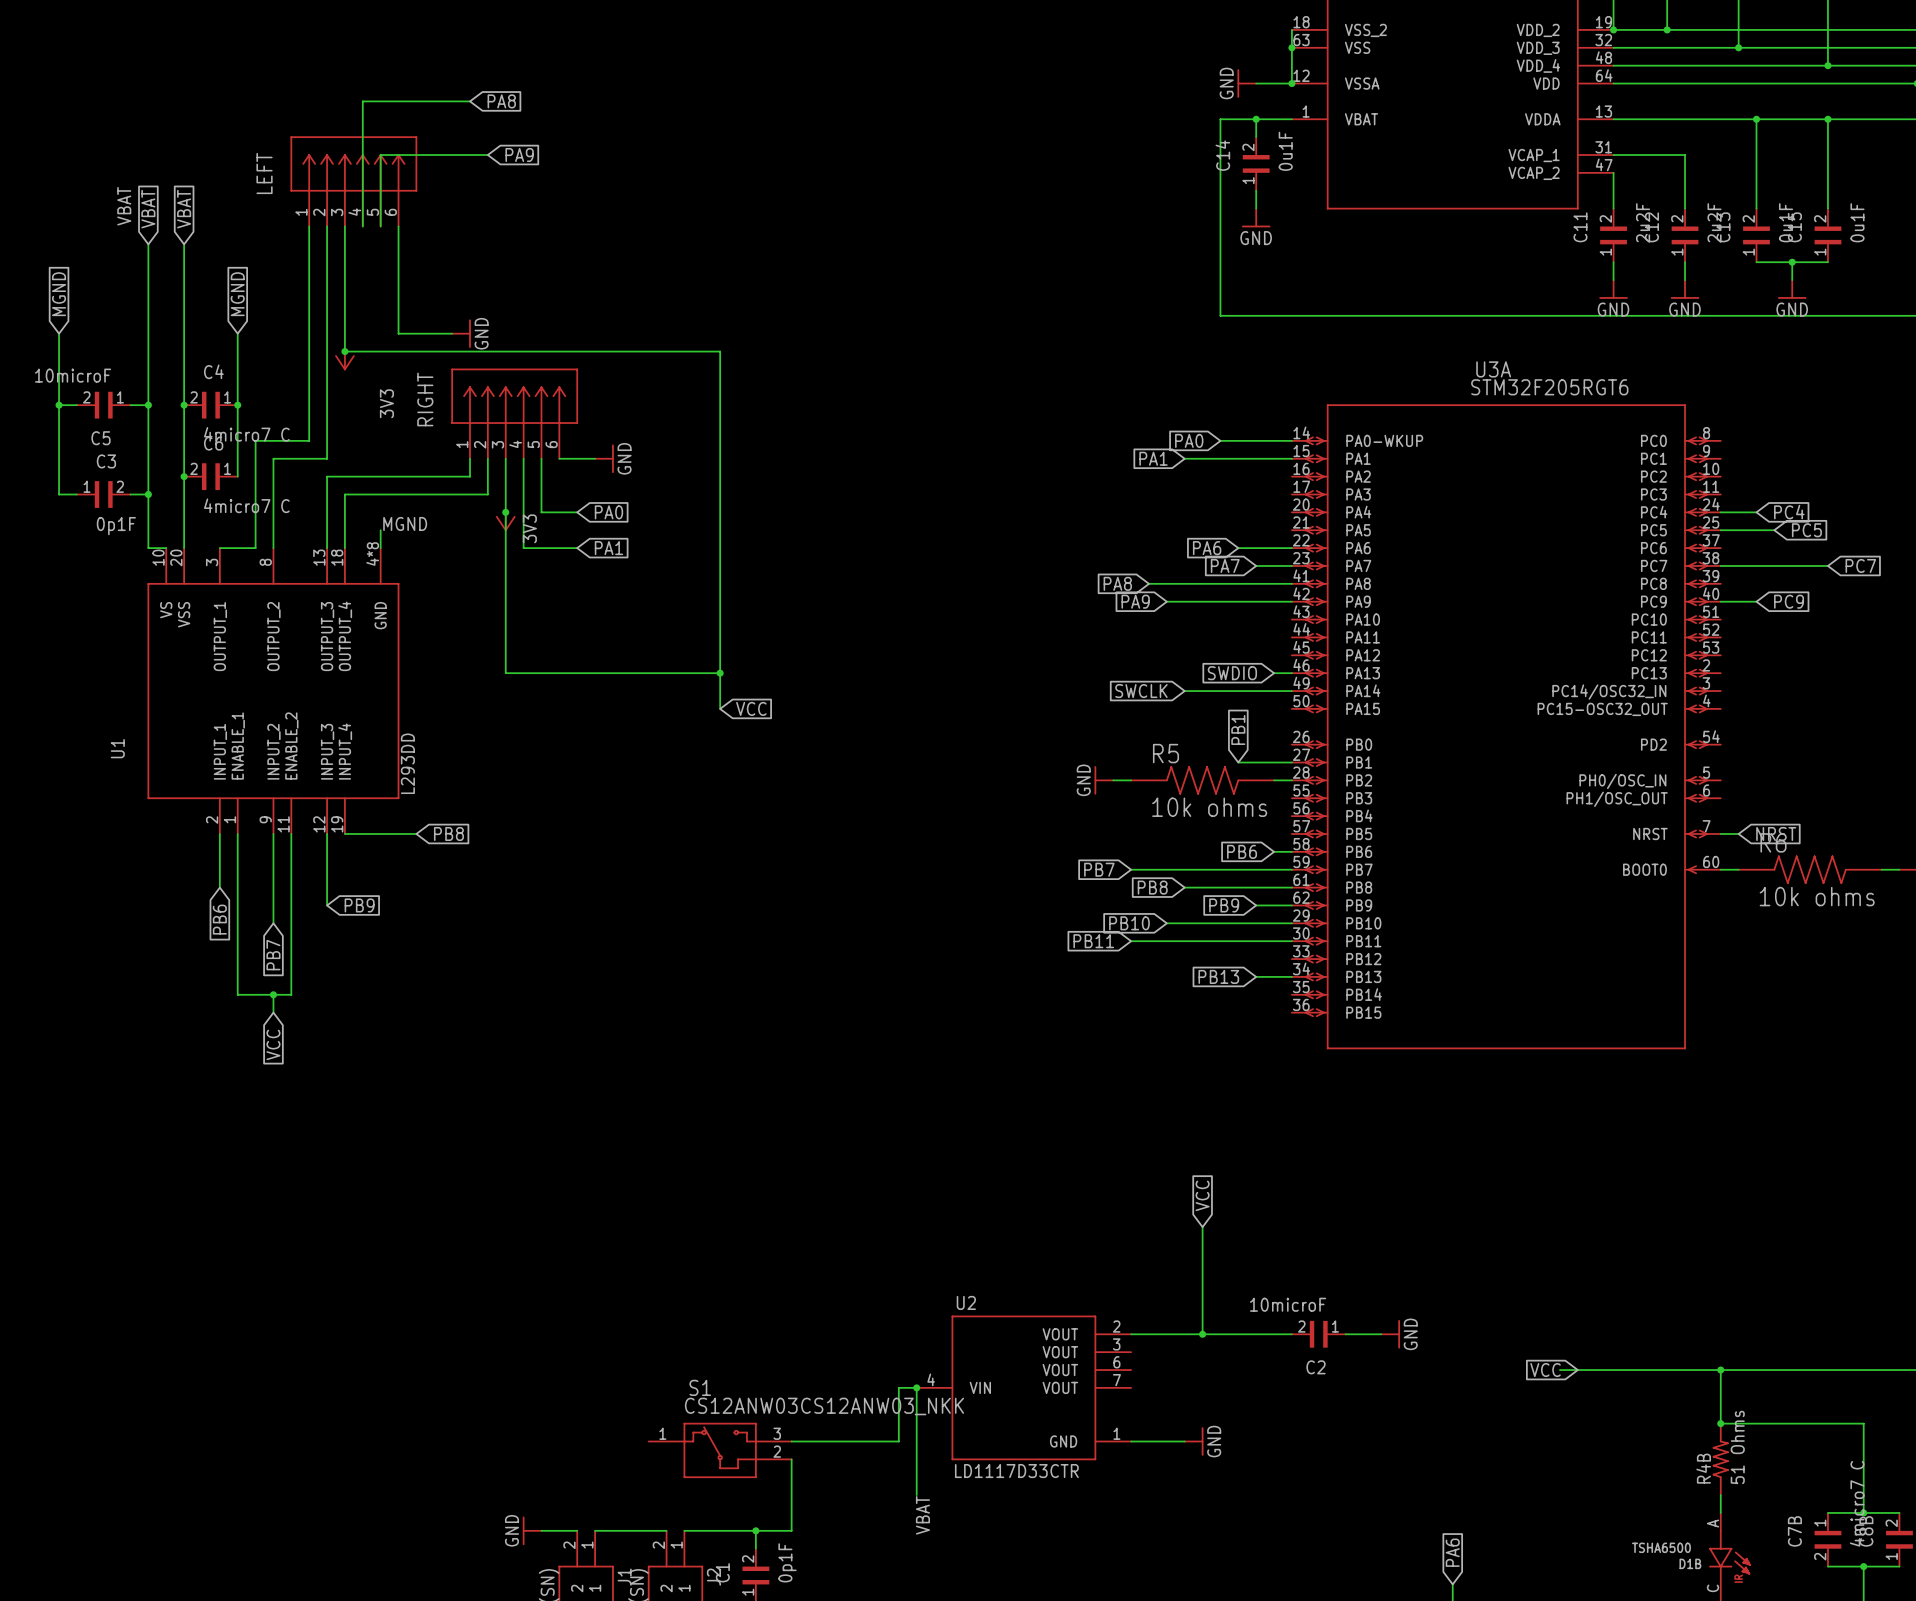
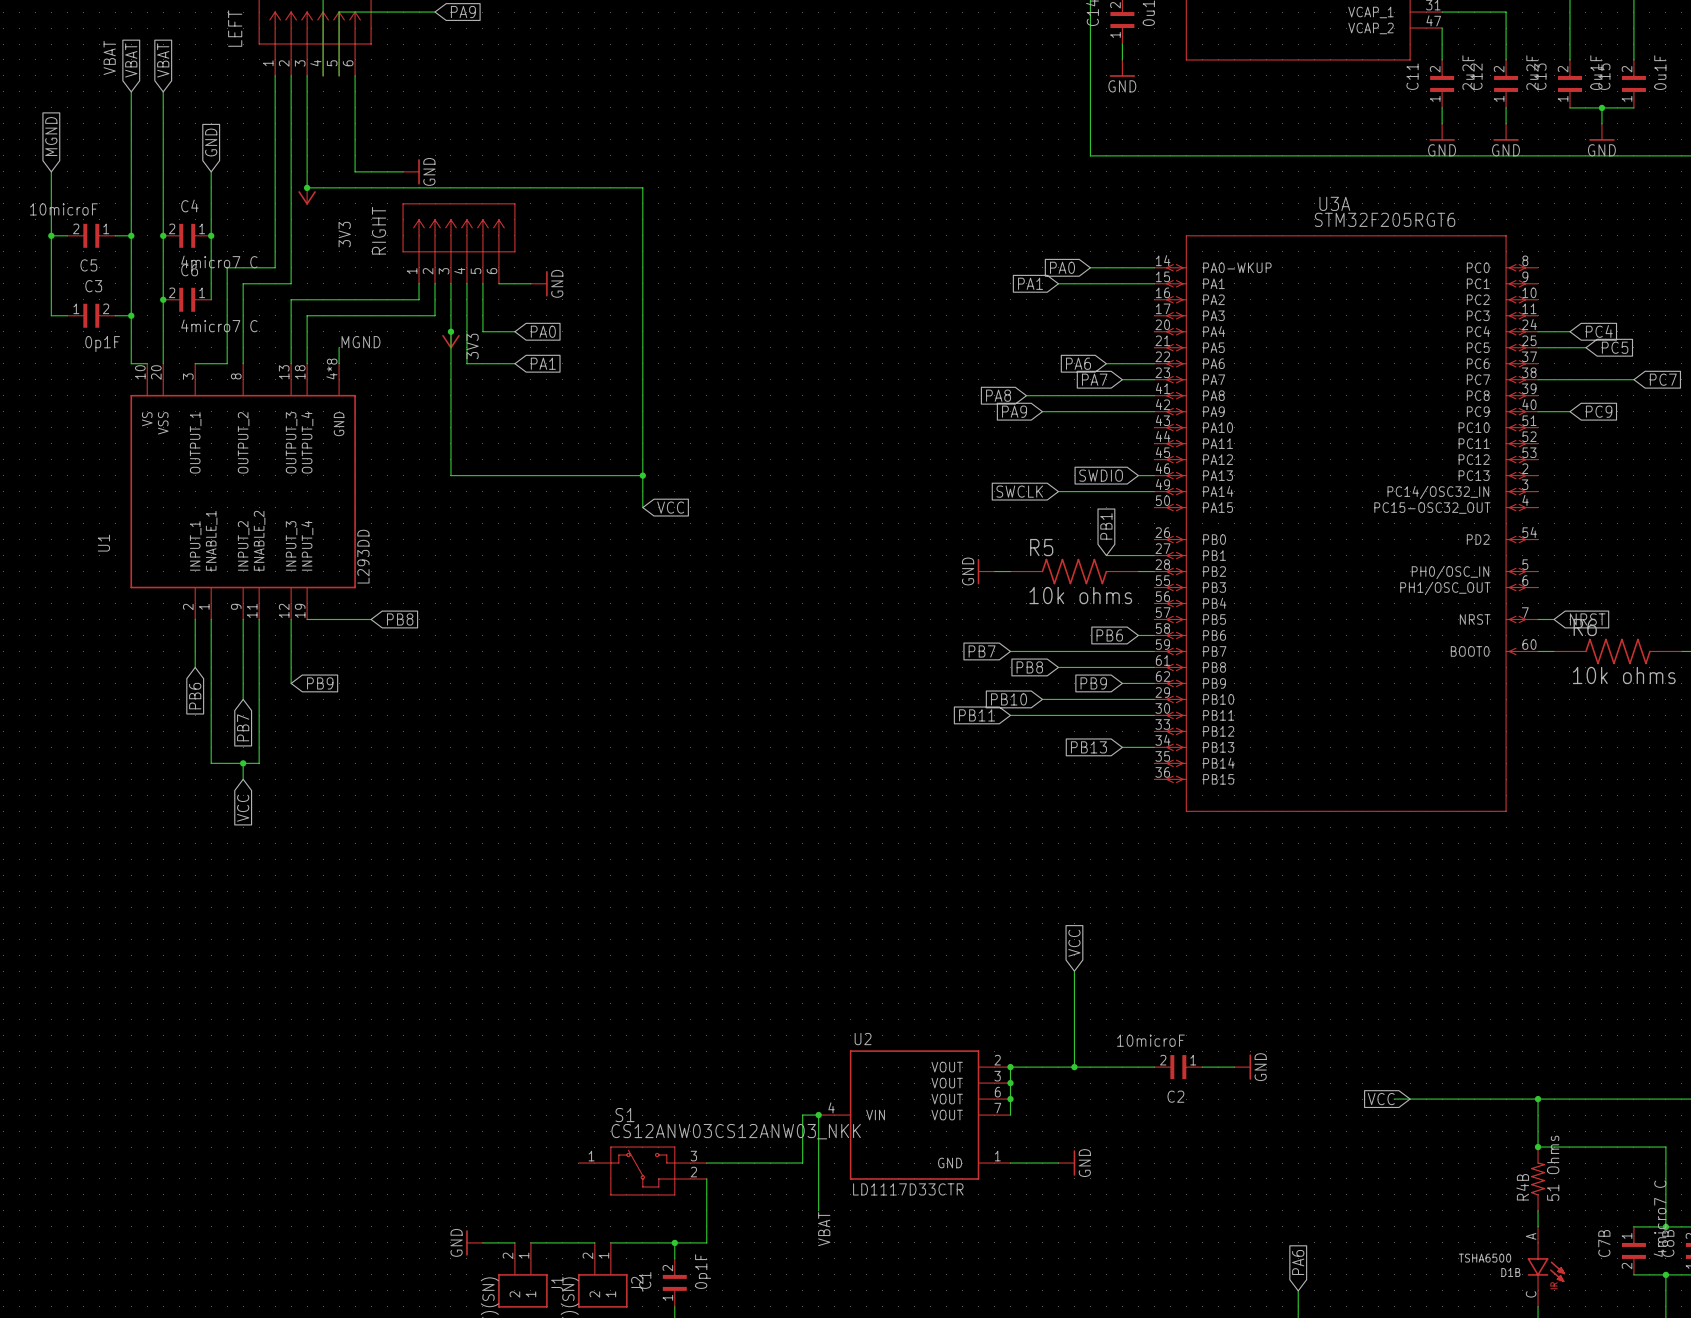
global label: MGND (237, 294) -> GND (211, 142)
wire: none -> (1010, 1067) (1010, 1115)
junction: none -> (1010, 1067)
junction: none -> (1010, 1083)
junction: none -> (1010, 1099)

